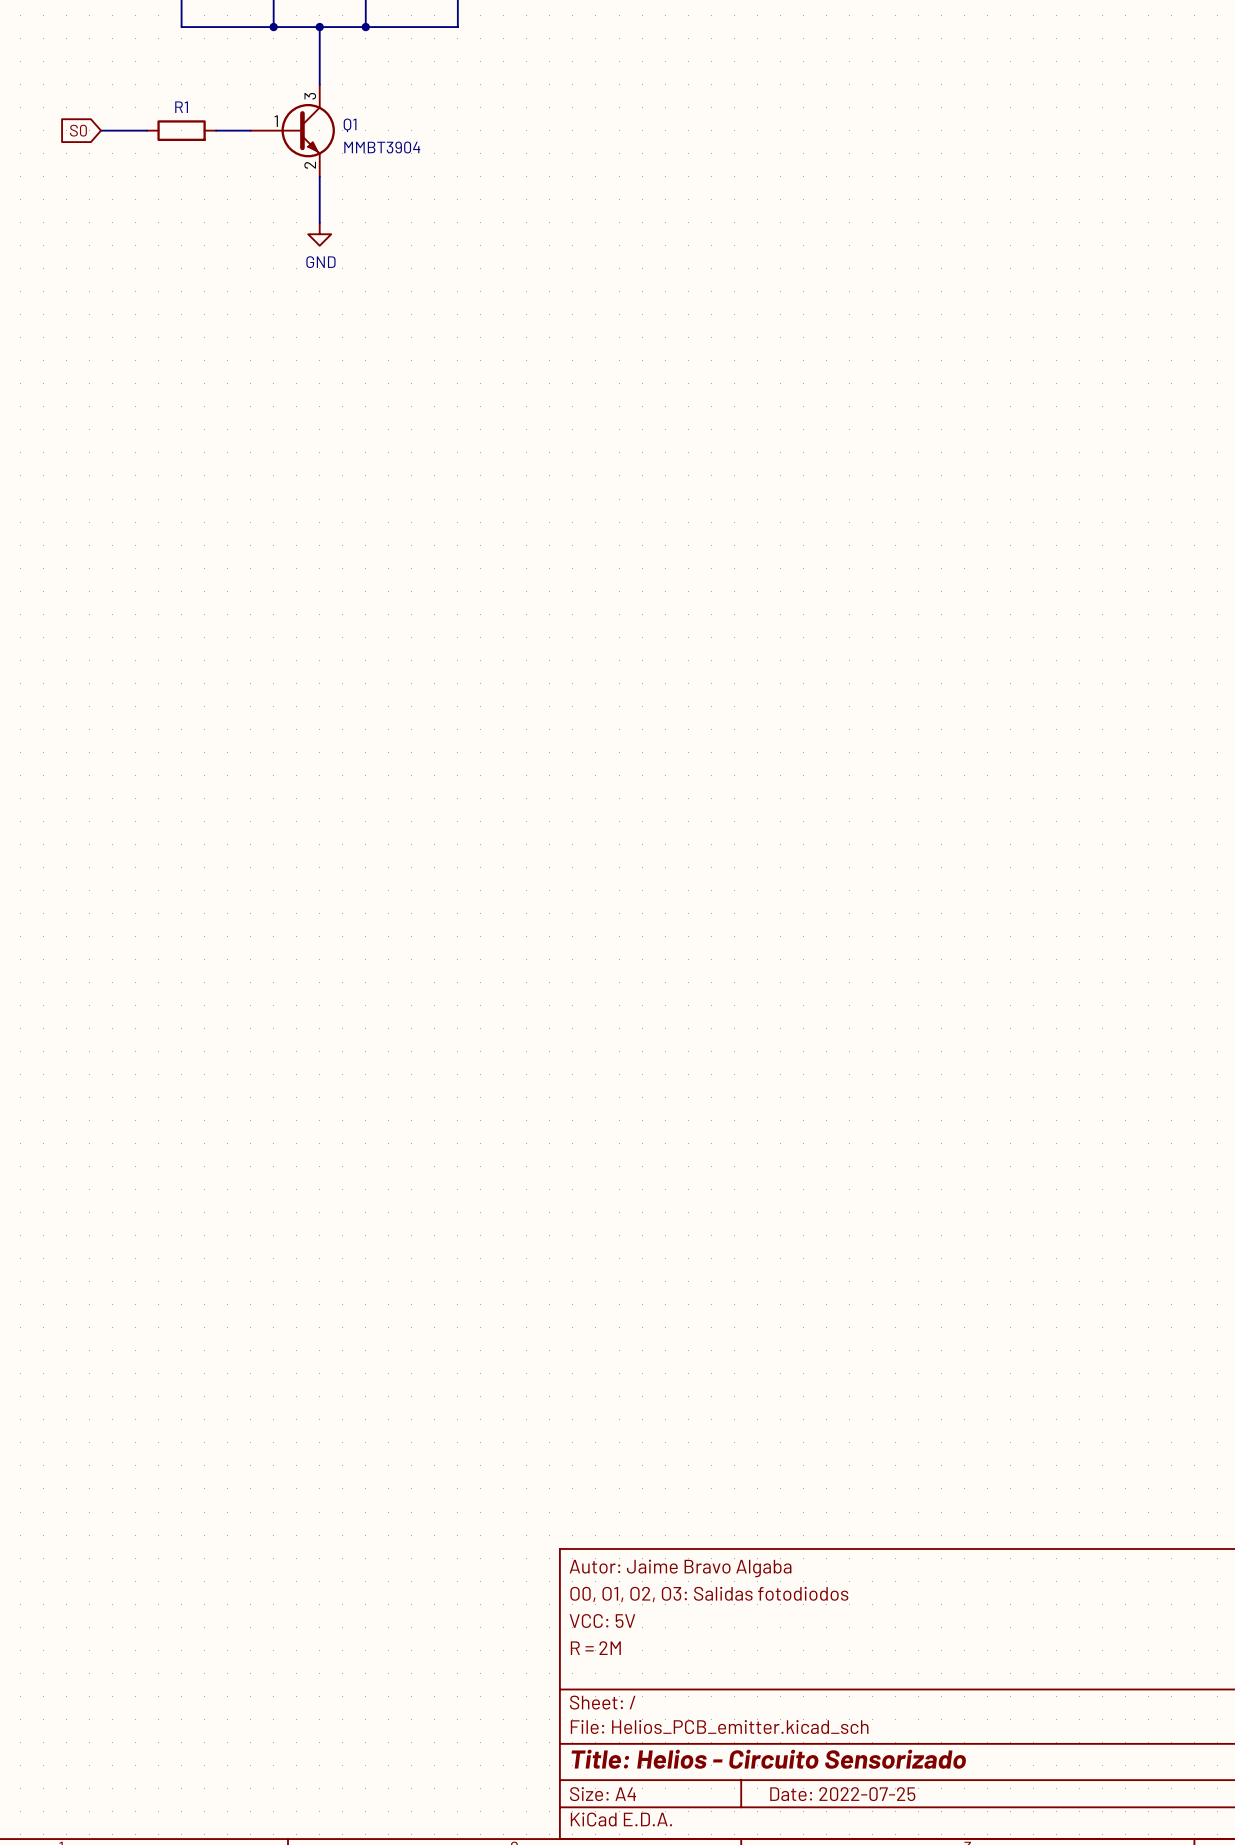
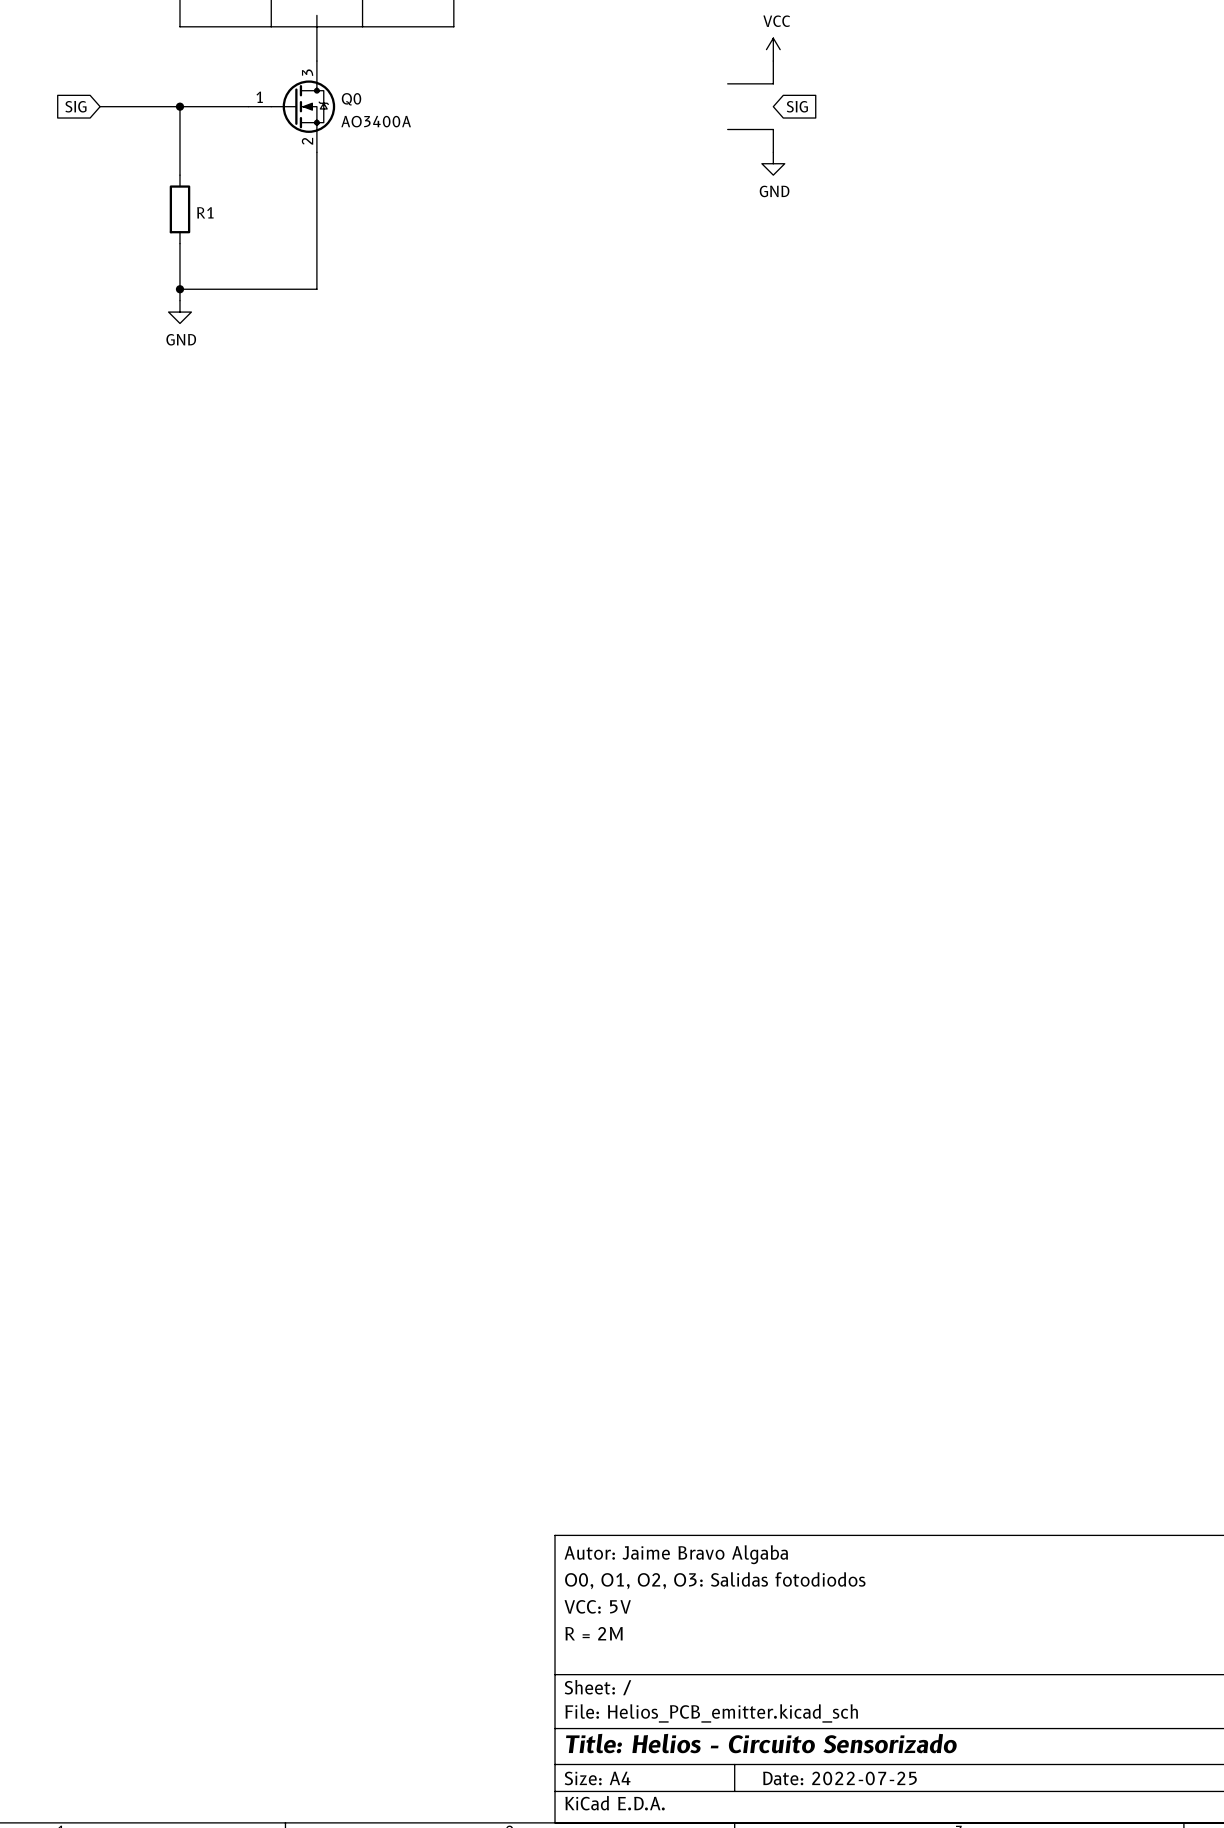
wire: none -> (316, 15) (316, 26)
junction: (273, 27) -> none
junction: (319, 27) -> none
junction: (365, 27) -> none
power symbol: none -> VCC (773, 49)
wire: none -> (773, 61) (773, 83) (727, 83)
global label: none -> SIG (75, 106)
wire: none -> (100, 106) (248, 106)
wire: none -> (179, 106) (179, 175)
junction: none -> (179, 106)
Q0: none -> AO3400A (291, 106)
global label: none -> SIG (797, 106)
global label: S0 (78, 130) -> none
wire: (101, 130) (147, 130) -> none
R1 rotation: 0° (181, 130) -> 90° clockwise (179, 209)
R1 position: (181, 130) -> (179, 209)
wire: (216, 130) (250, 130) -> none
Q1: MMBT3904 (292, 130) -> none
wire: none -> (727, 129) (773, 129) (773, 152)
power symbol: none -> GND (773, 163)
wire: none -> (316, 220) (316, 289) (179, 289)
power symbol position: GND (319, 234) -> GND (179, 312)
wire: none -> (179, 243) (179, 300)
junction: none -> (179, 289)

